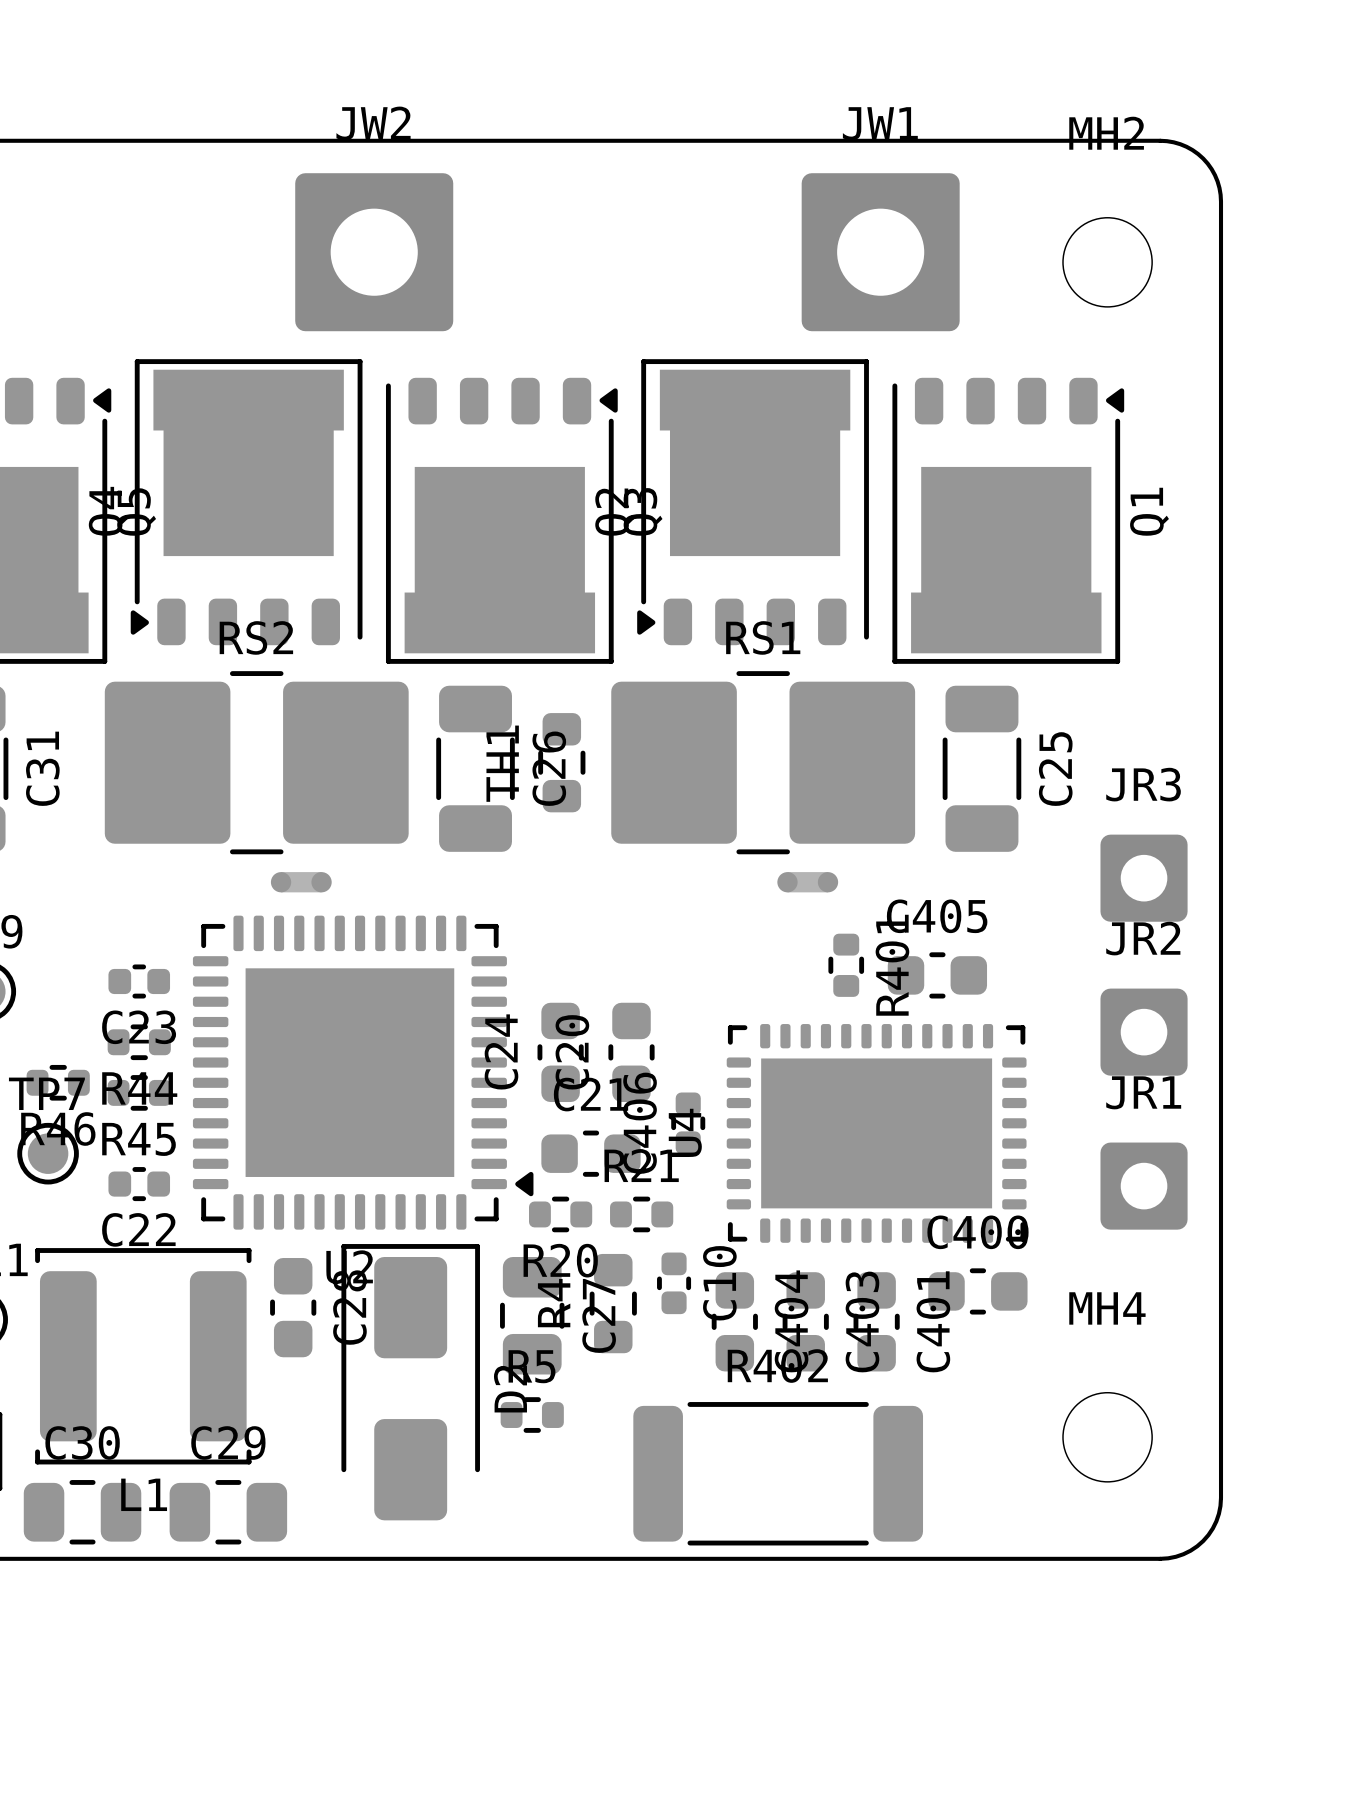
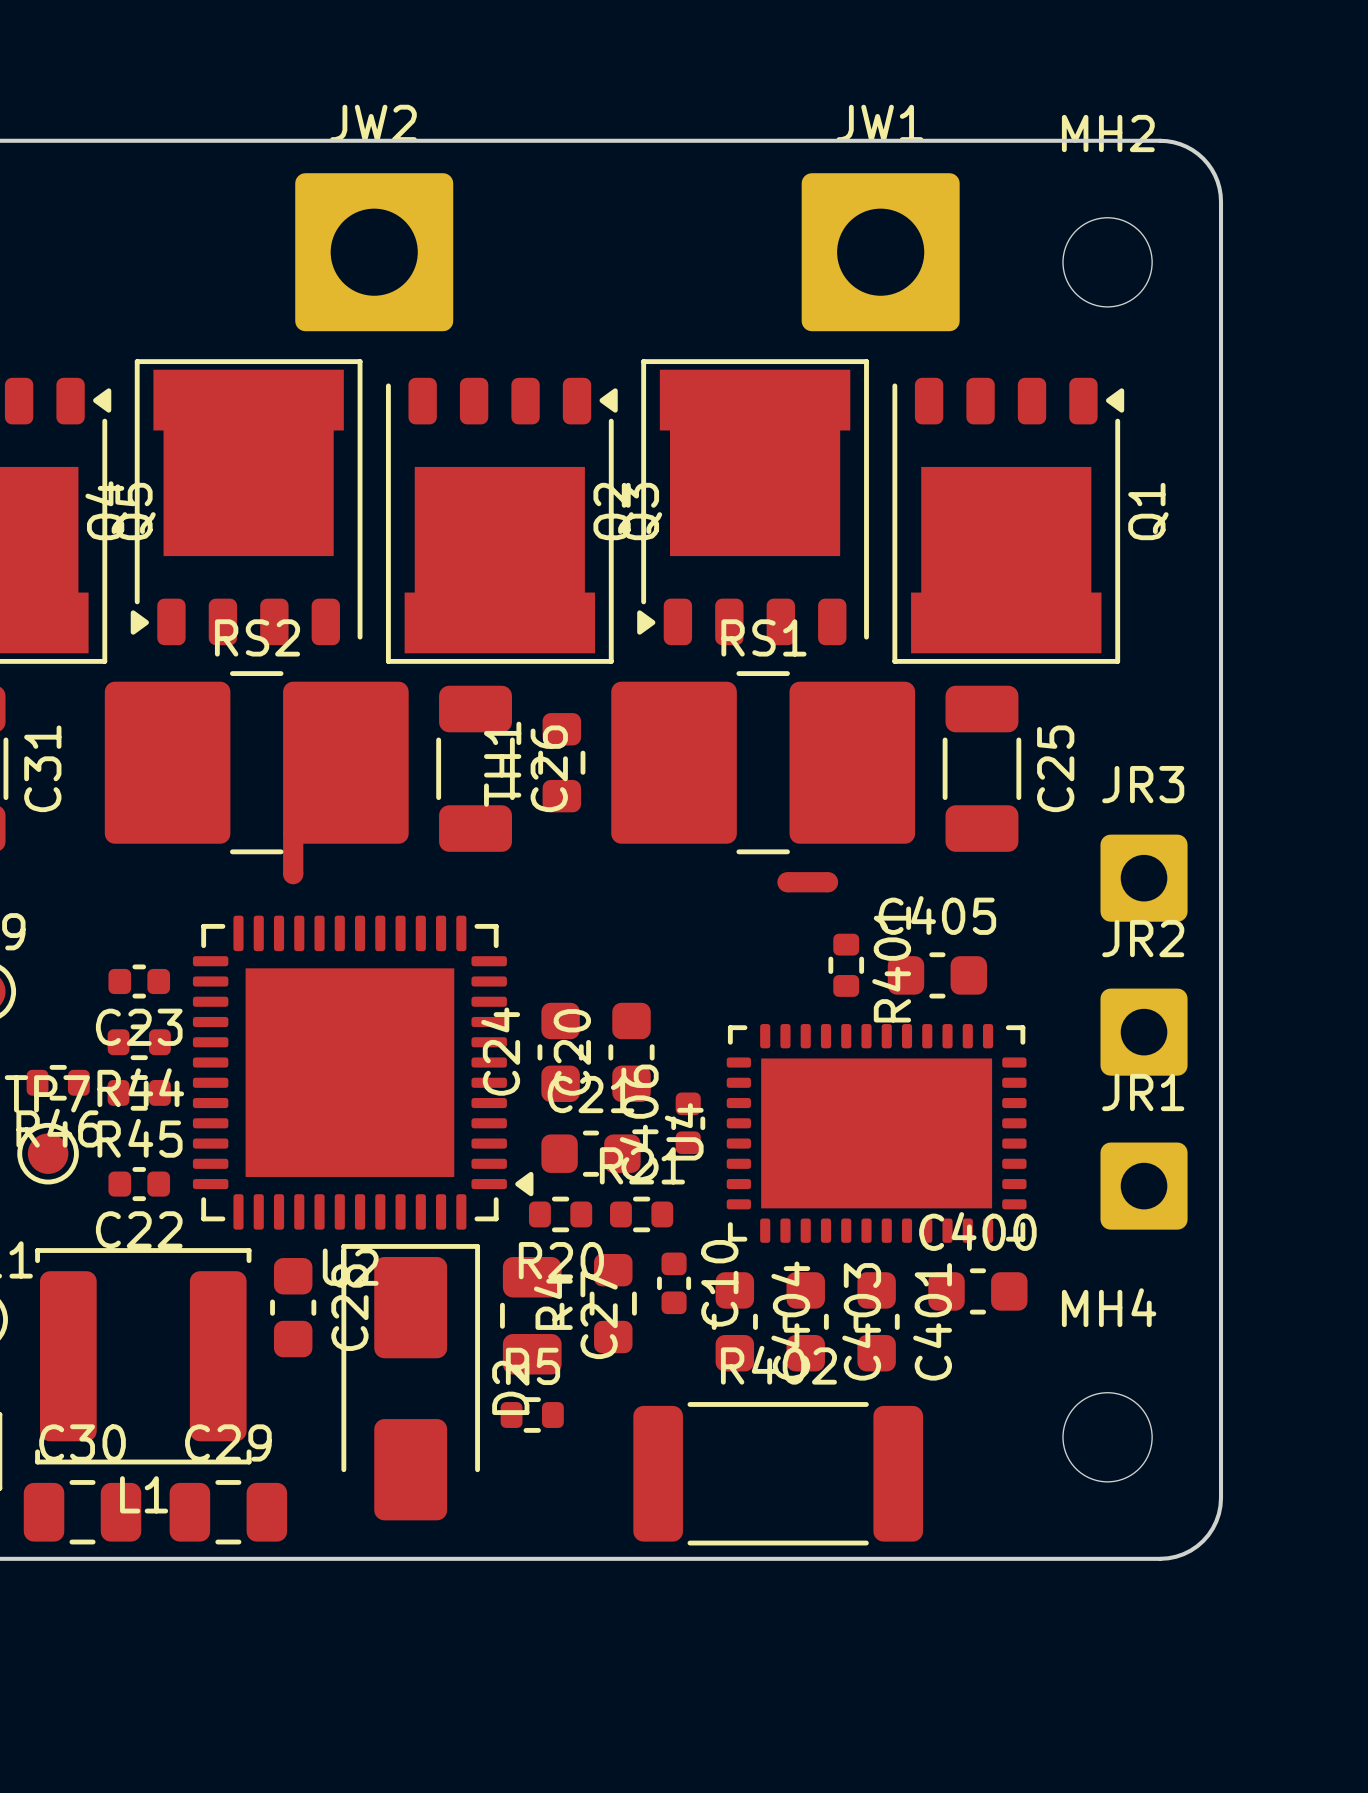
part rotation: 0° (301, 882) -> 90° clockwise (293, 853)

